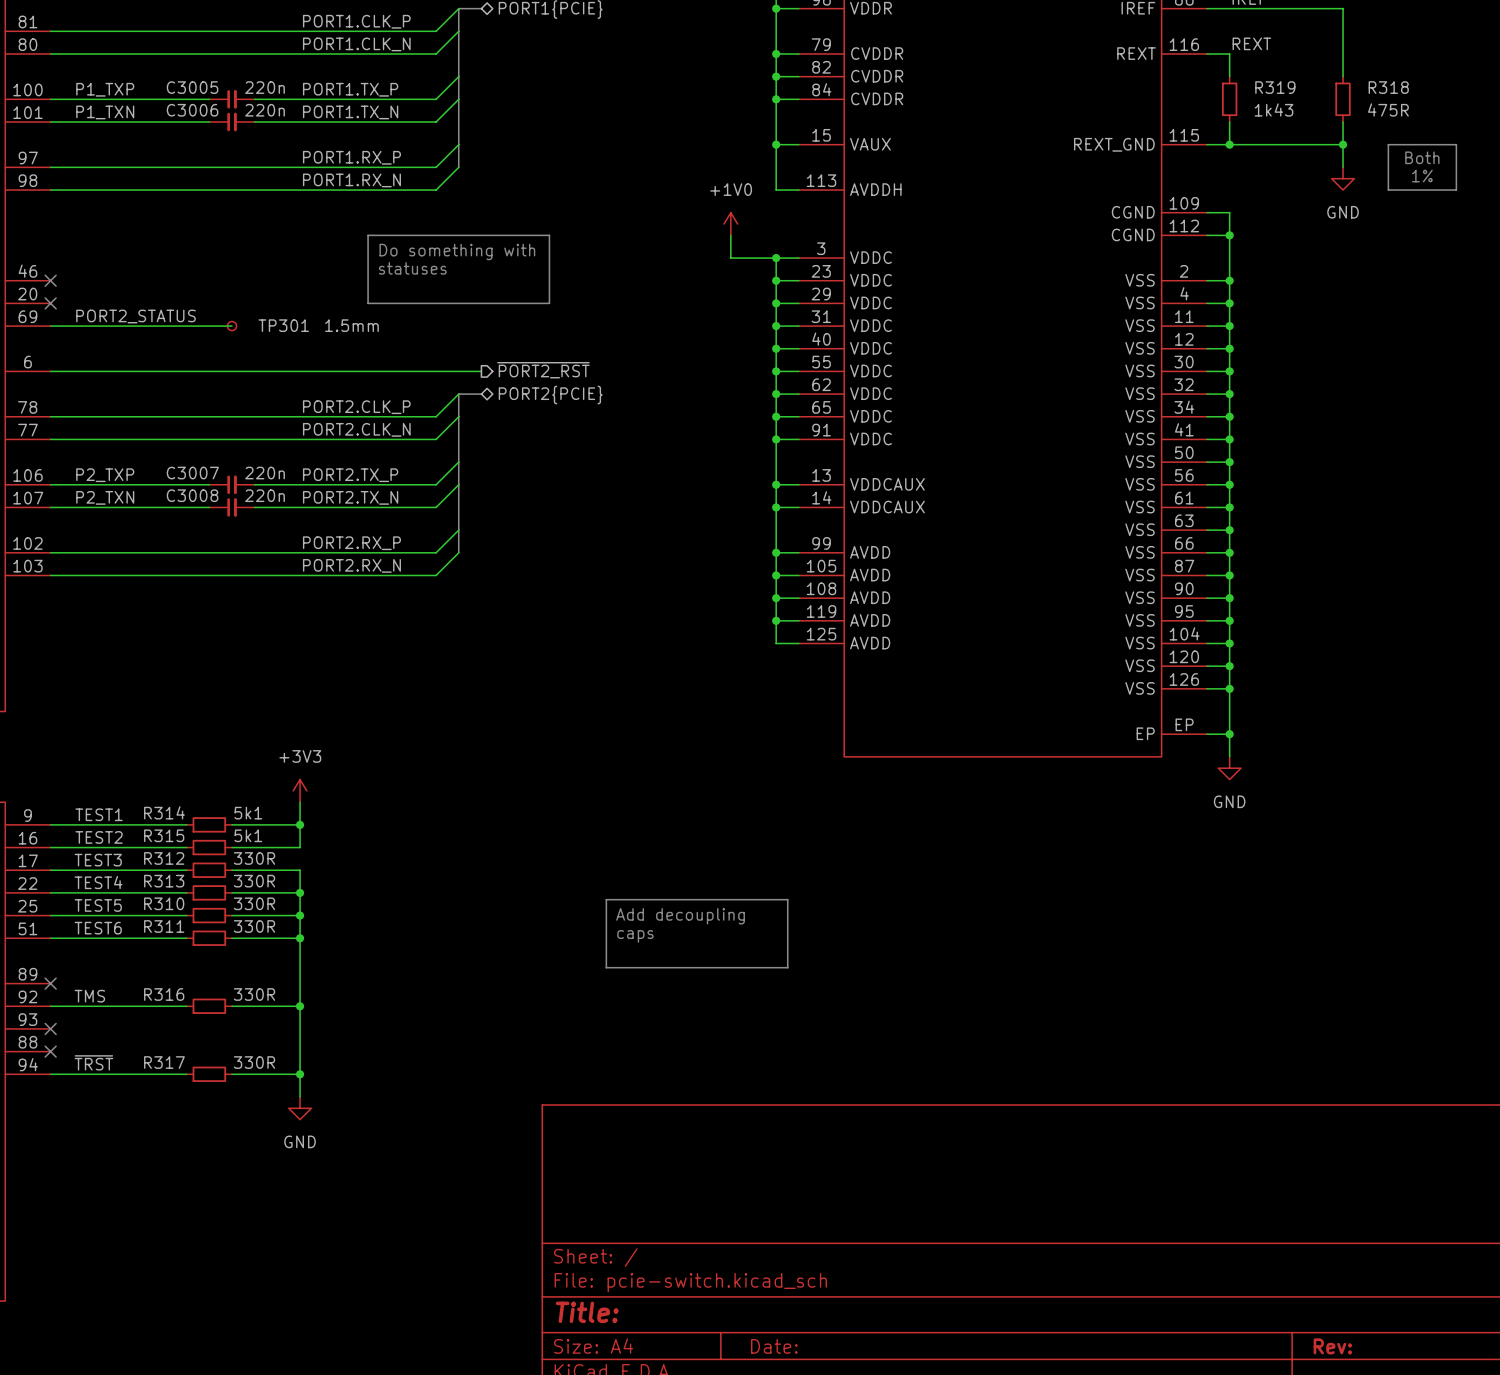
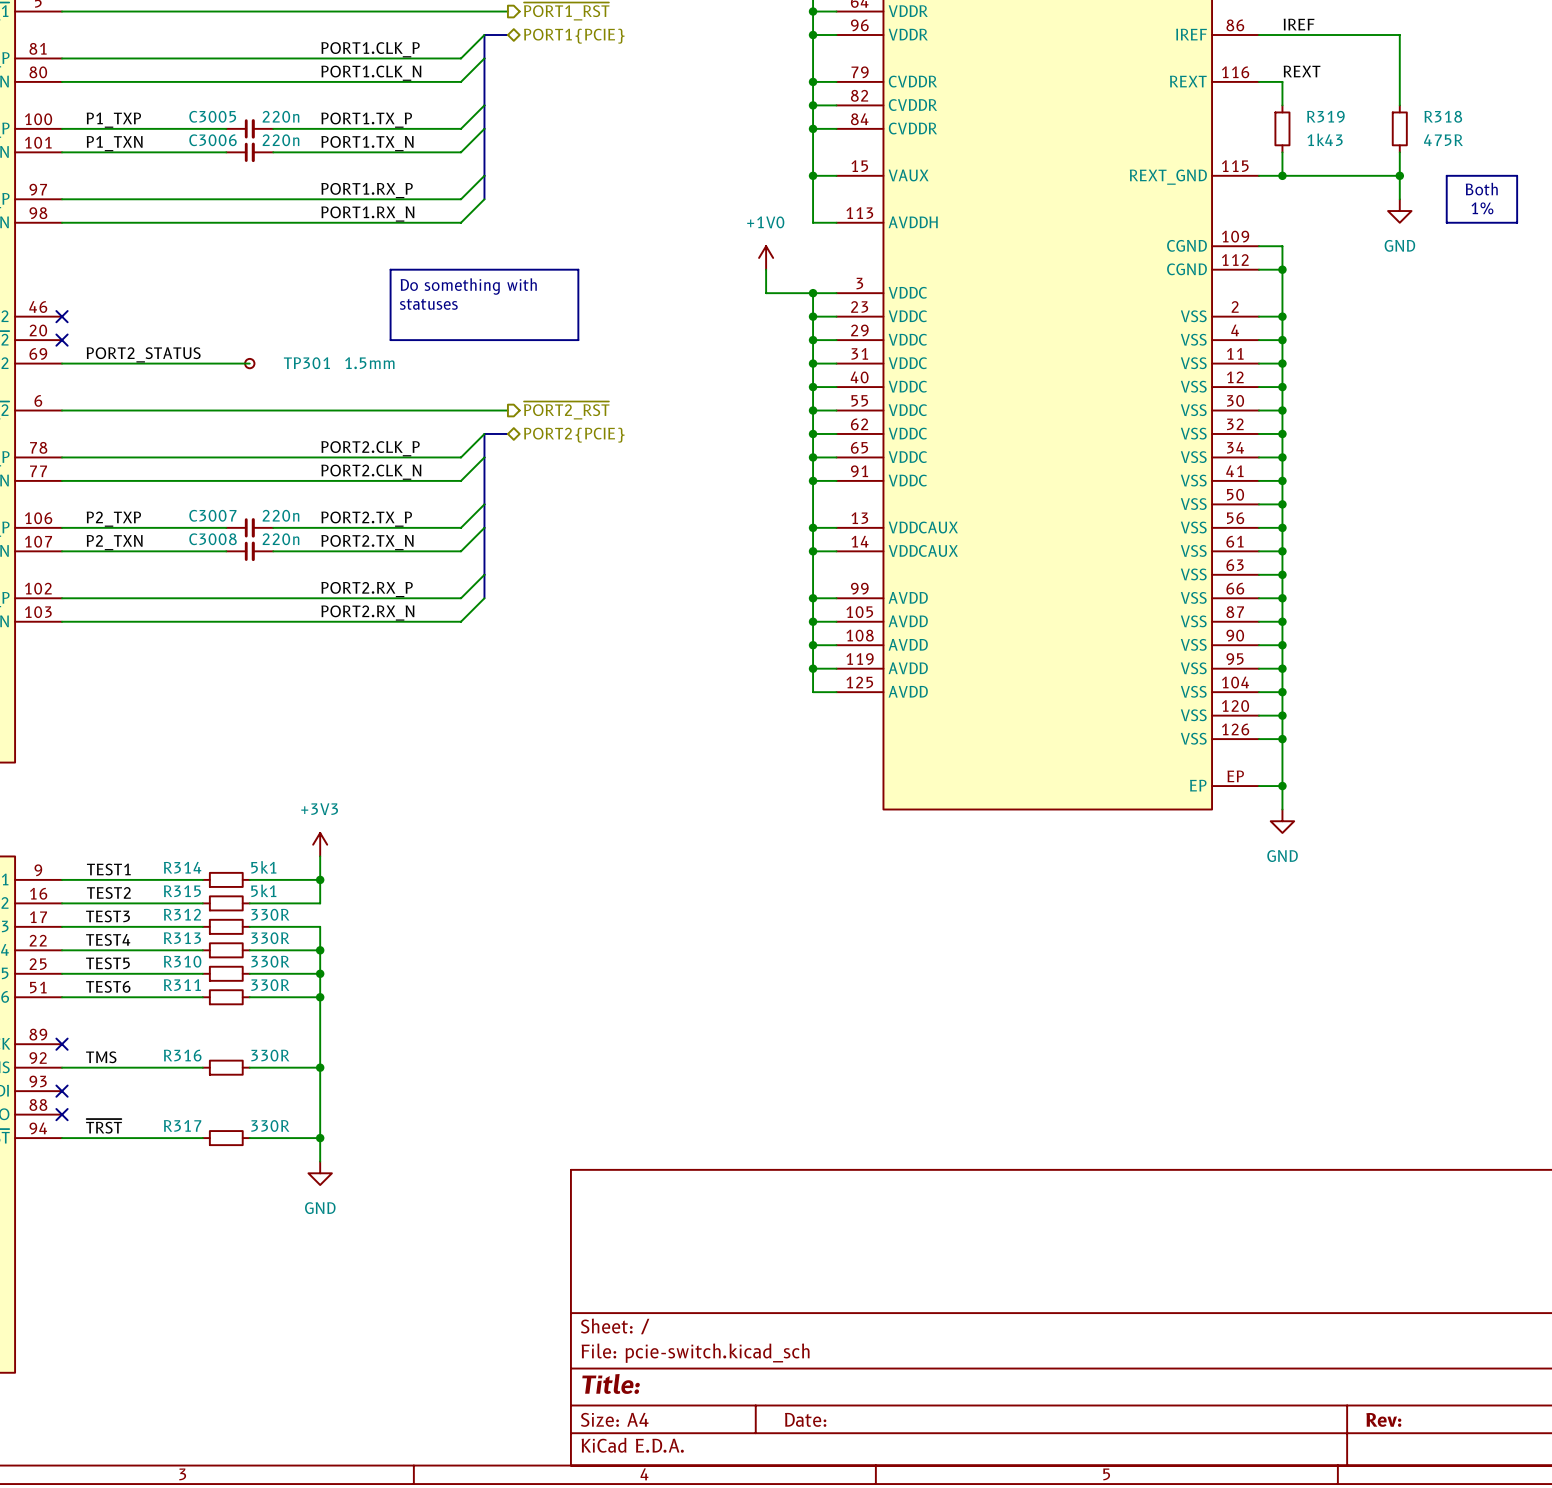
line: (606, 899) (787, 899) (787, 967) (606, 967) (606, 899) -> none
text: Add decoupling (680, 916) -> none
text: caps (635, 936) -> none

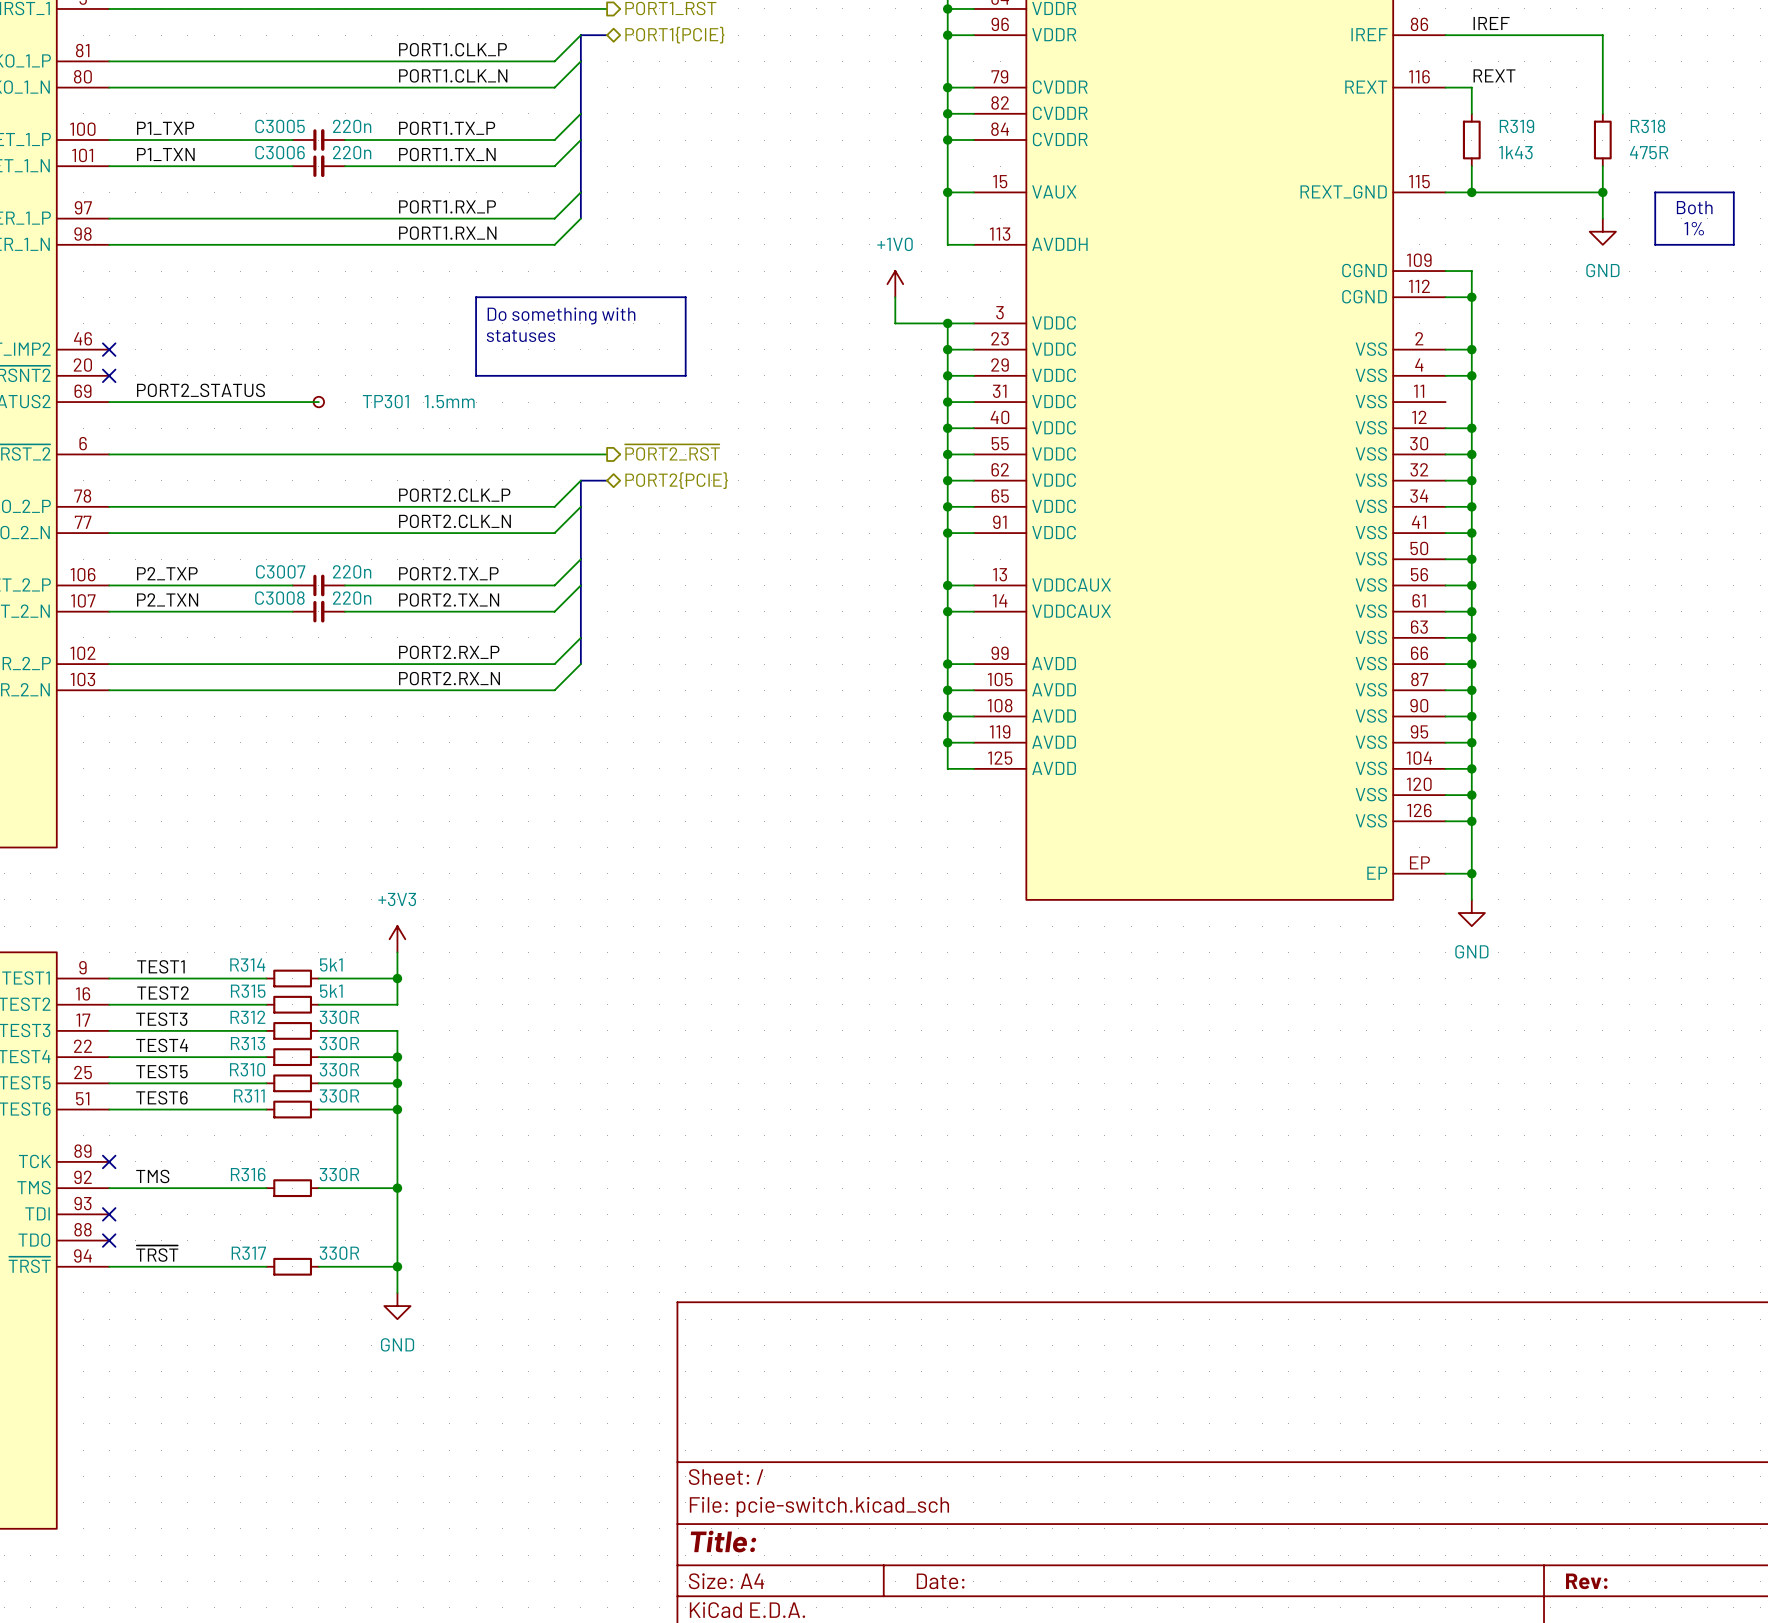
wire: (1258, 363) (1282, 363) -> none
junction: (1282, 363) -> none

